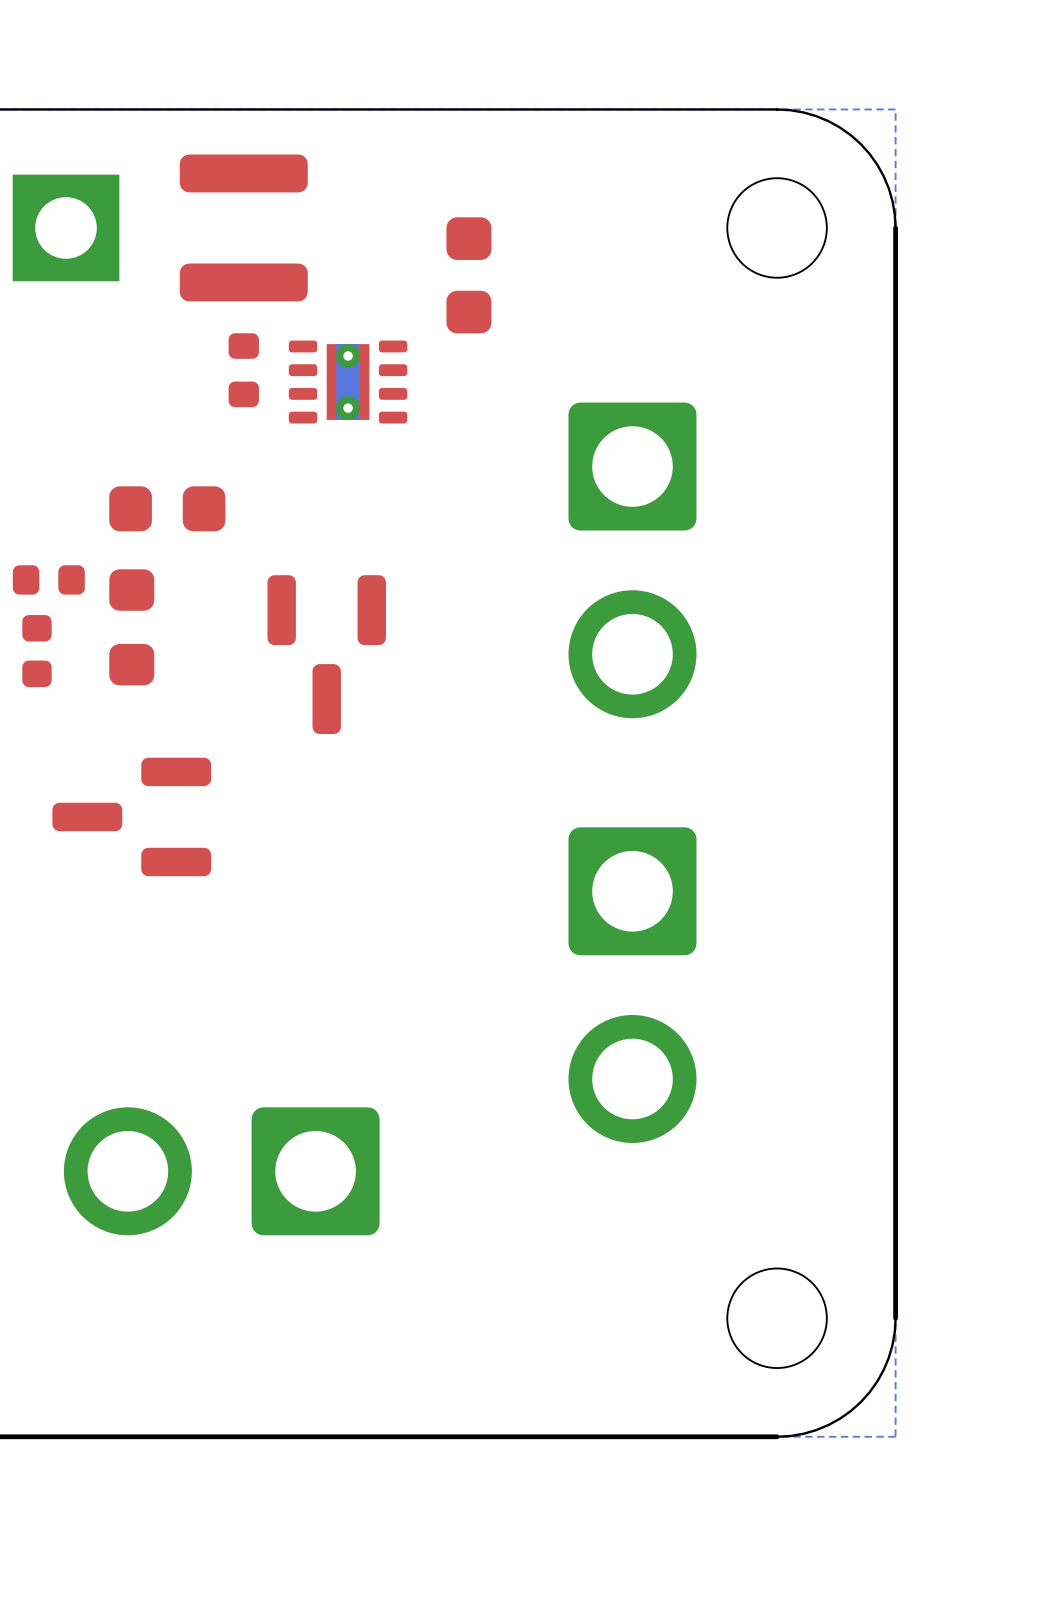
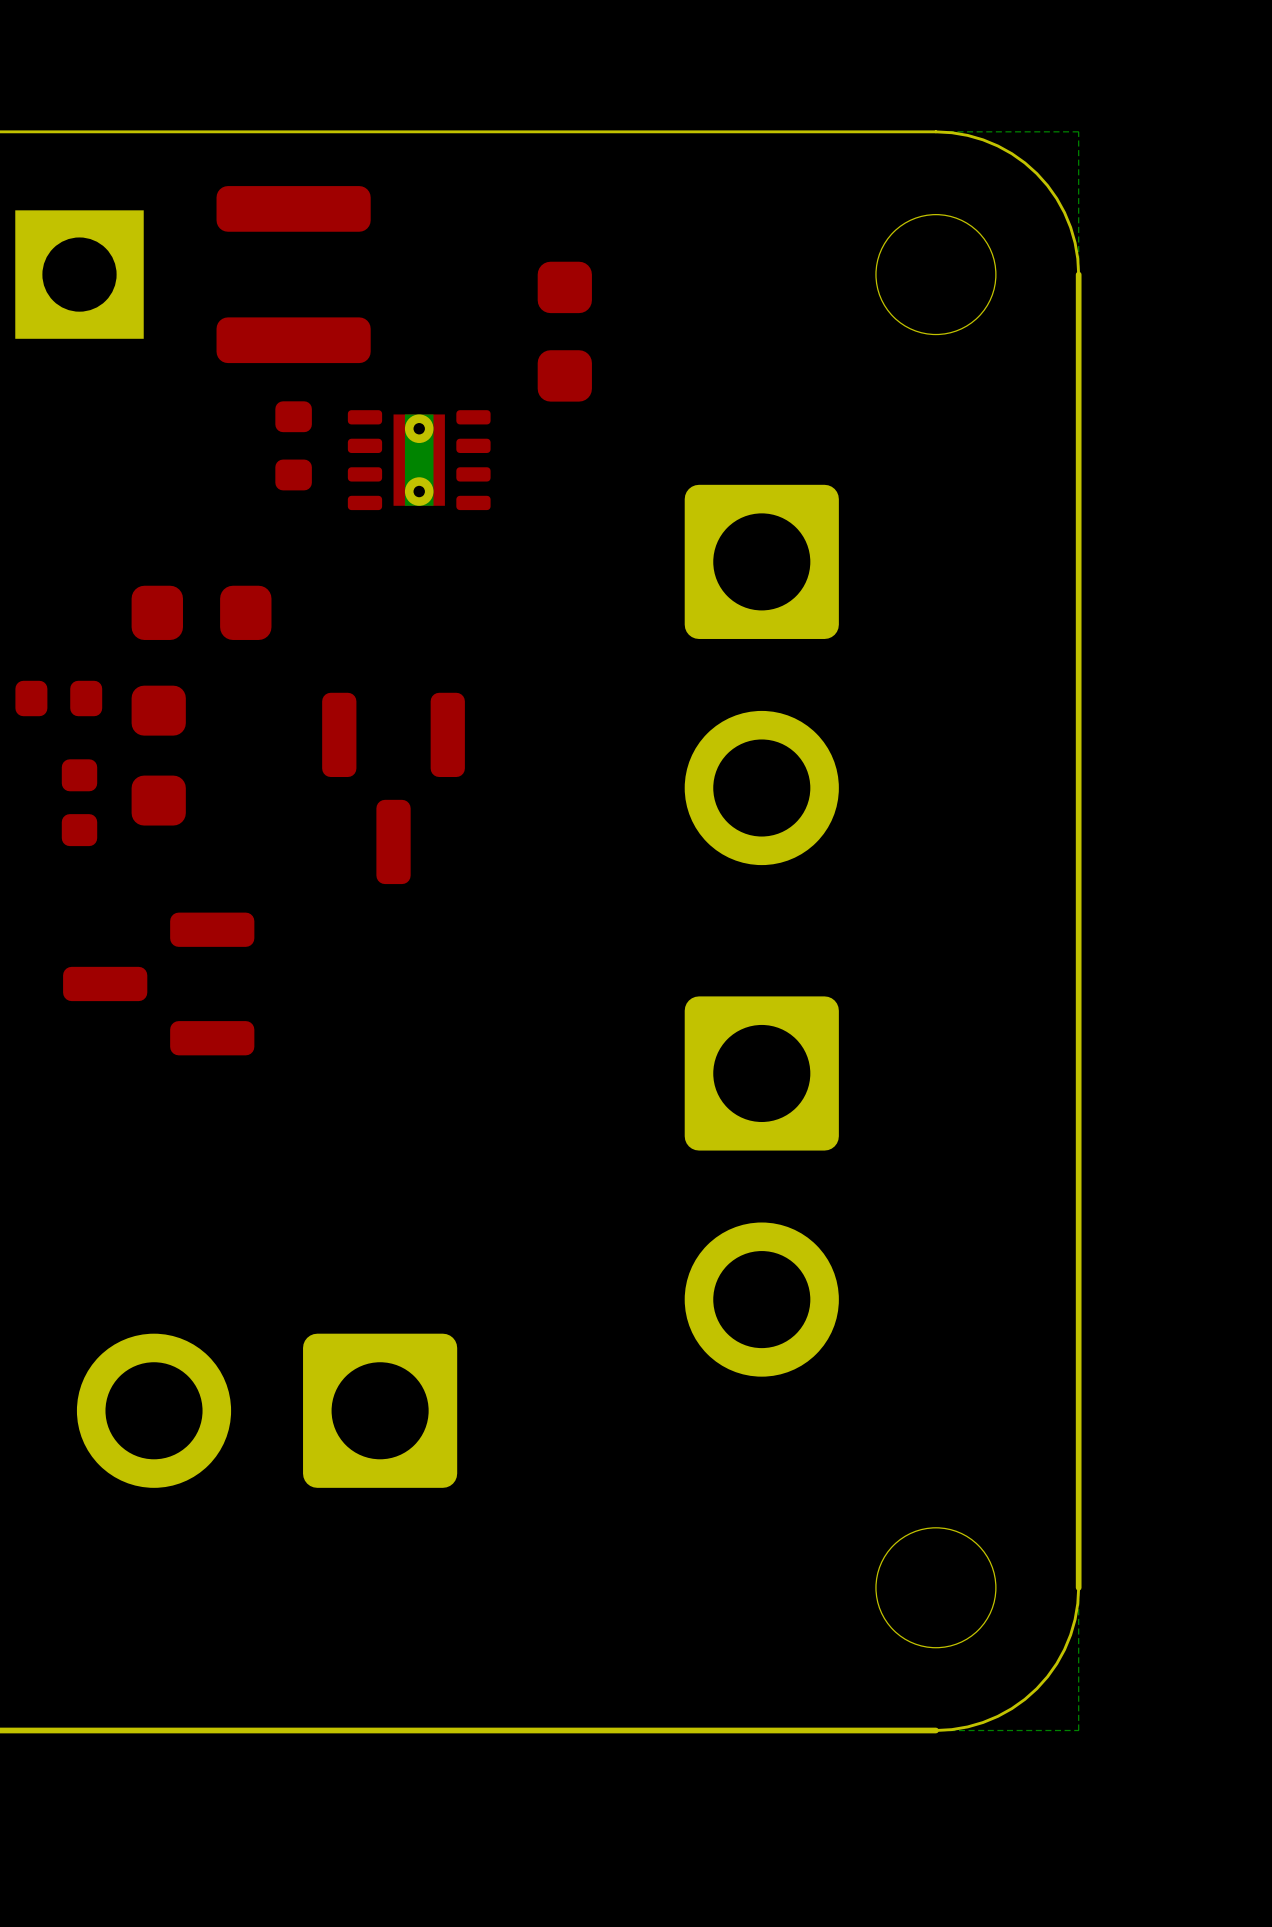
part position: (36, 651) -> (79, 802)

